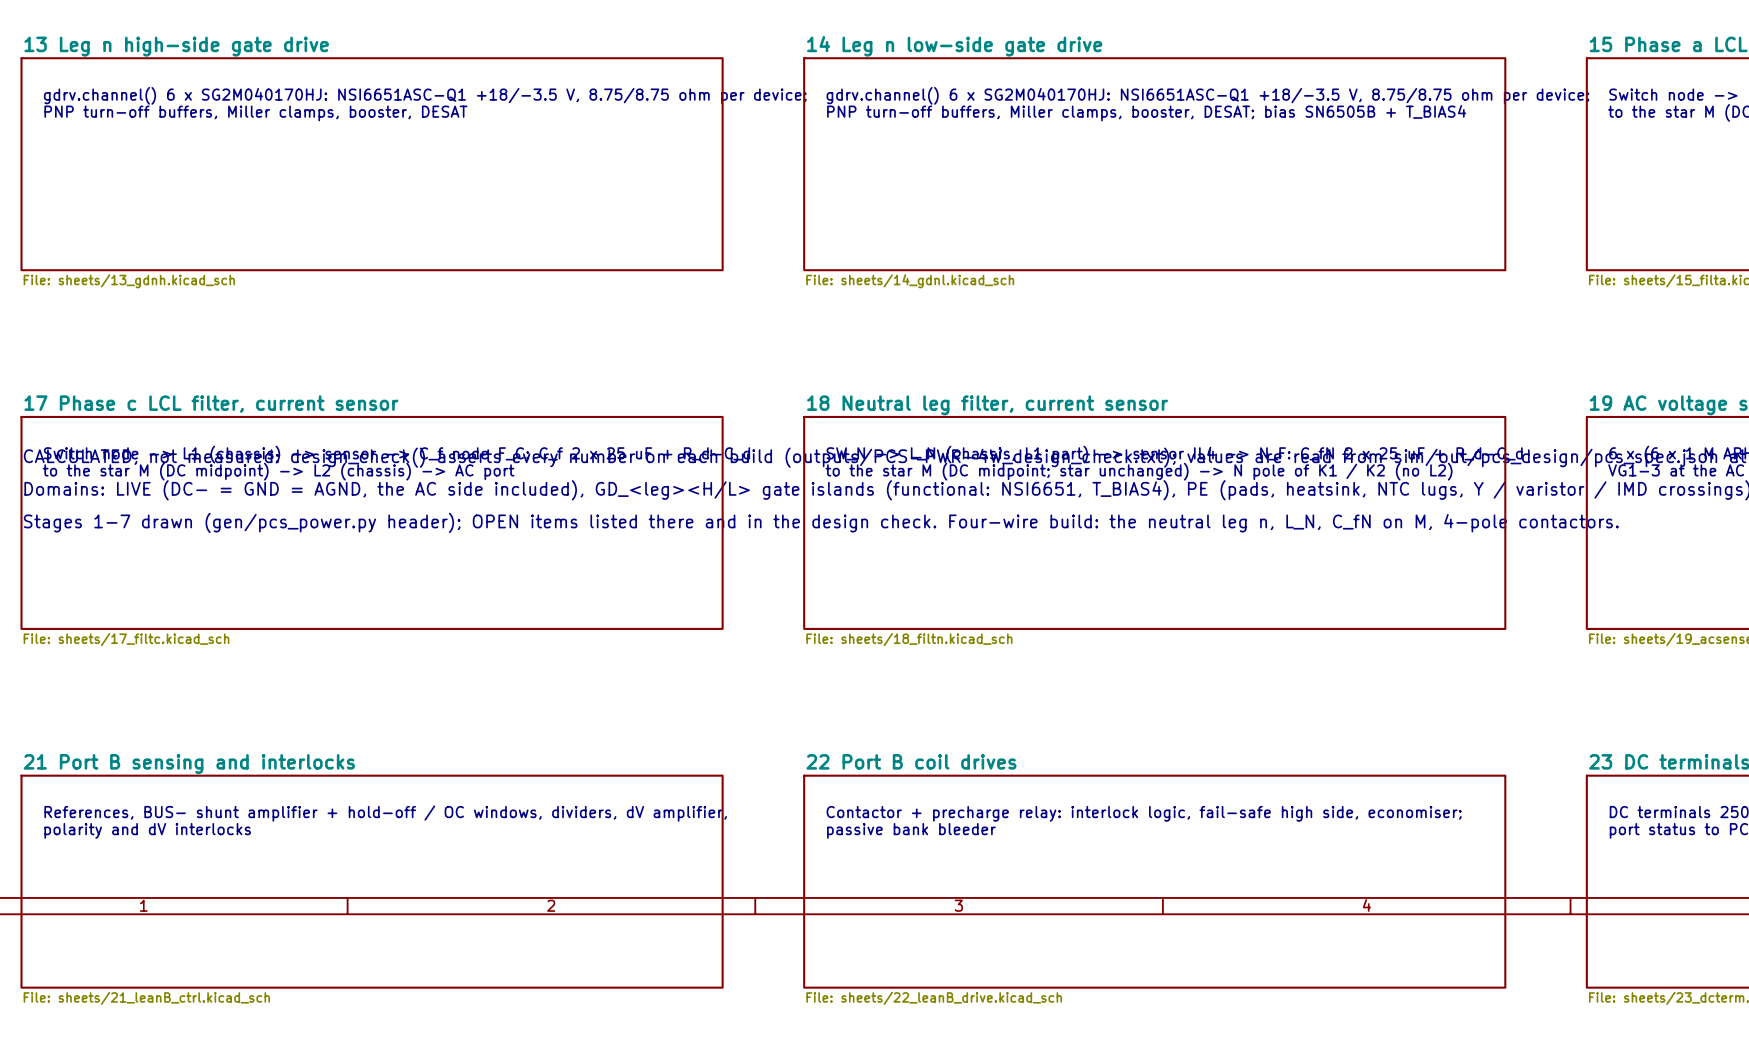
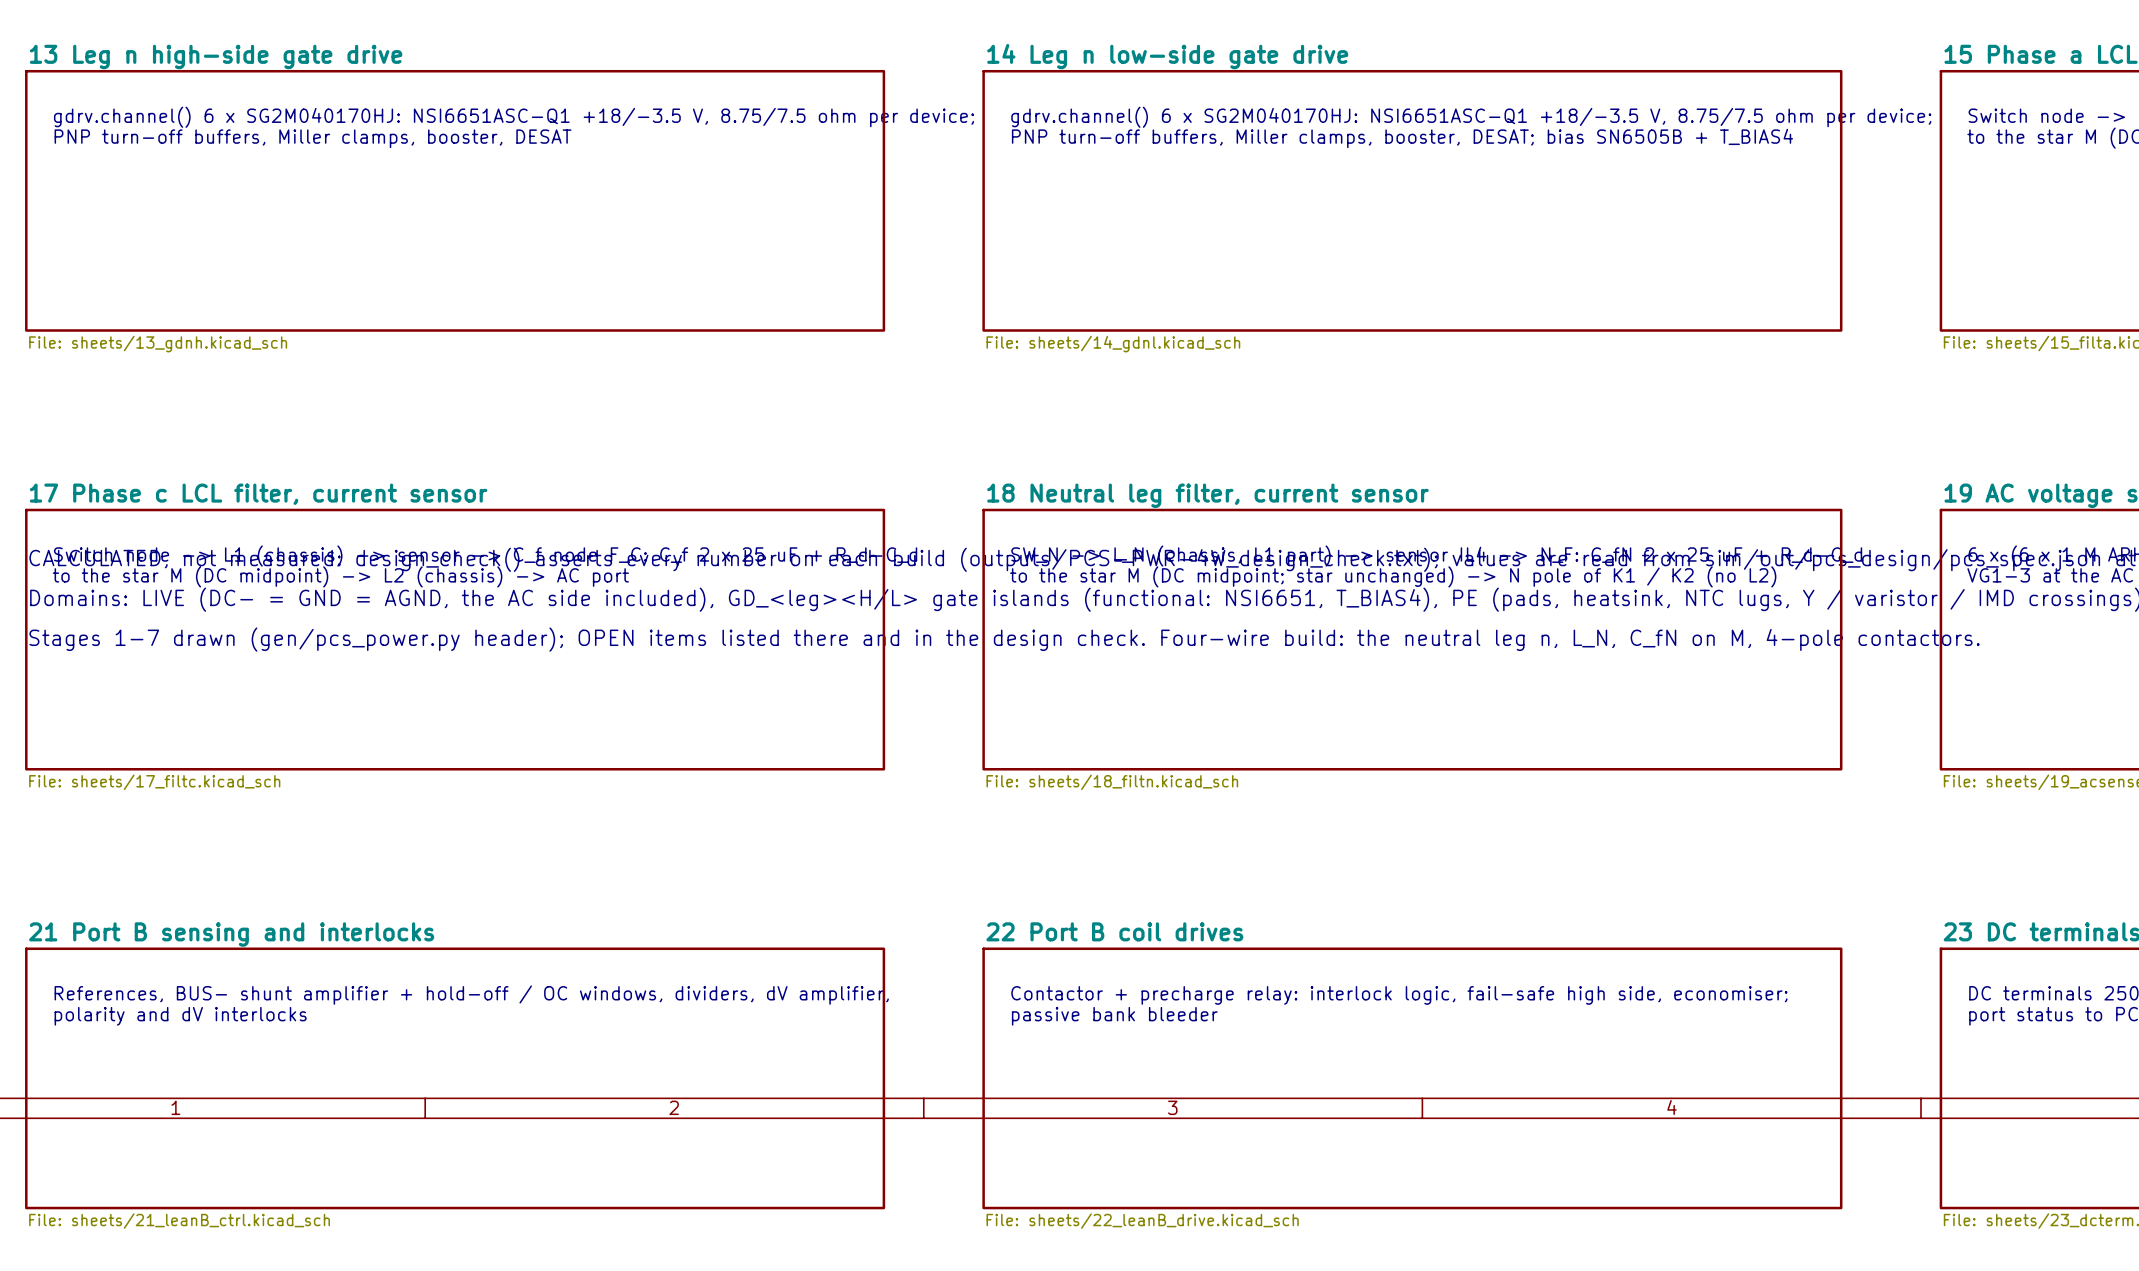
text: gdrv.channel() 6 x SG2M040170HJ: NSI6651ASC-Q1 +18/-3.5 V, 8.75/8.75 ohm per device; (425, 95) -> gdrv.channel() 6 x SG2M040170HJ: NSI6651ASC-Q1 +18/-3.5 V, 8.75/7.5 ohm per device; (513, 117)
text: gdrv.channel() 6 x SG2M040170HJ: NSI6651ASC-Q1 +18/-3.5 V, 8.75/8.75 ohm per device; (1207, 95) -> gdrv.channel() 6 x SG2M040170HJ: NSI6651ASC-Q1 +18/-3.5 V, 8.75/7.5 ohm per device; (1471, 117)

